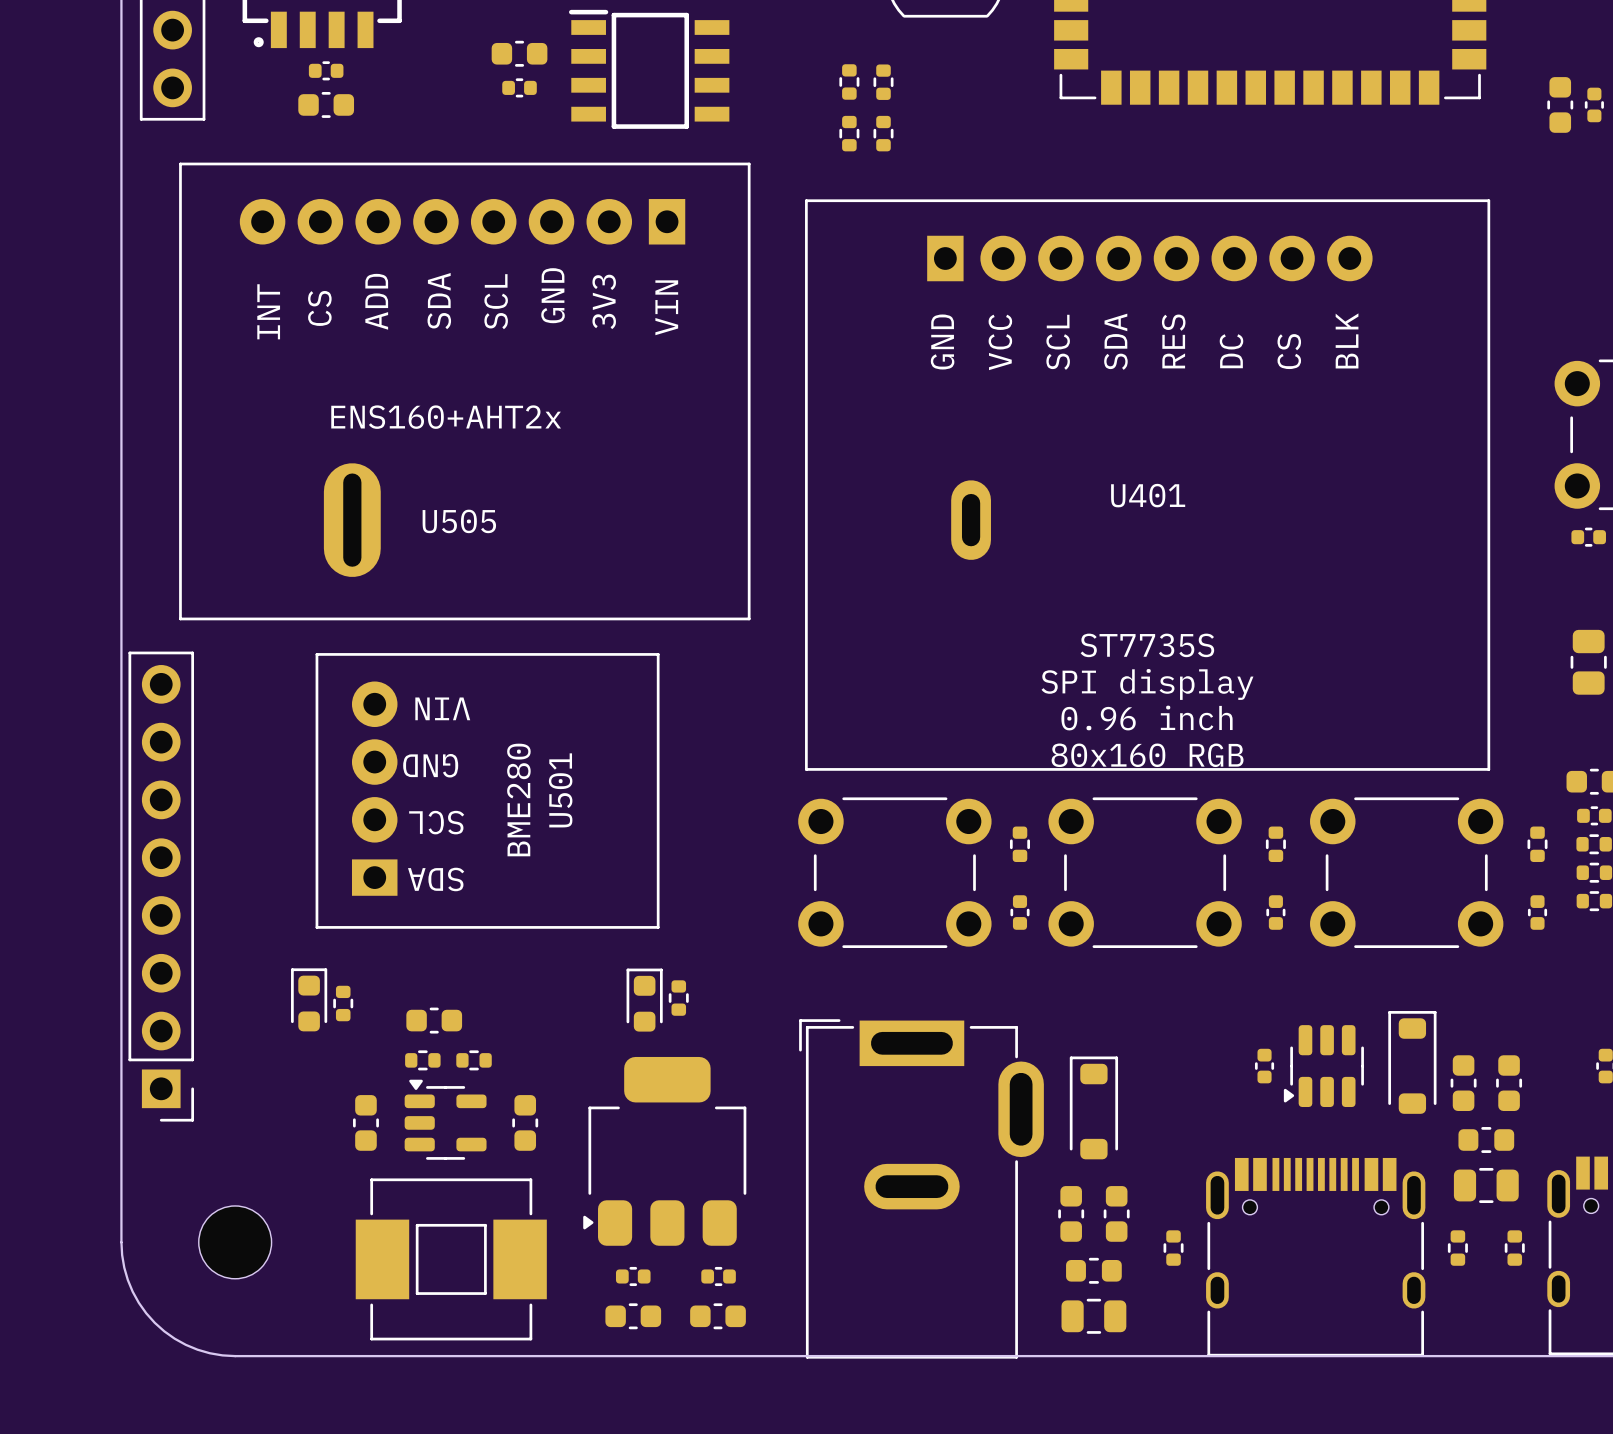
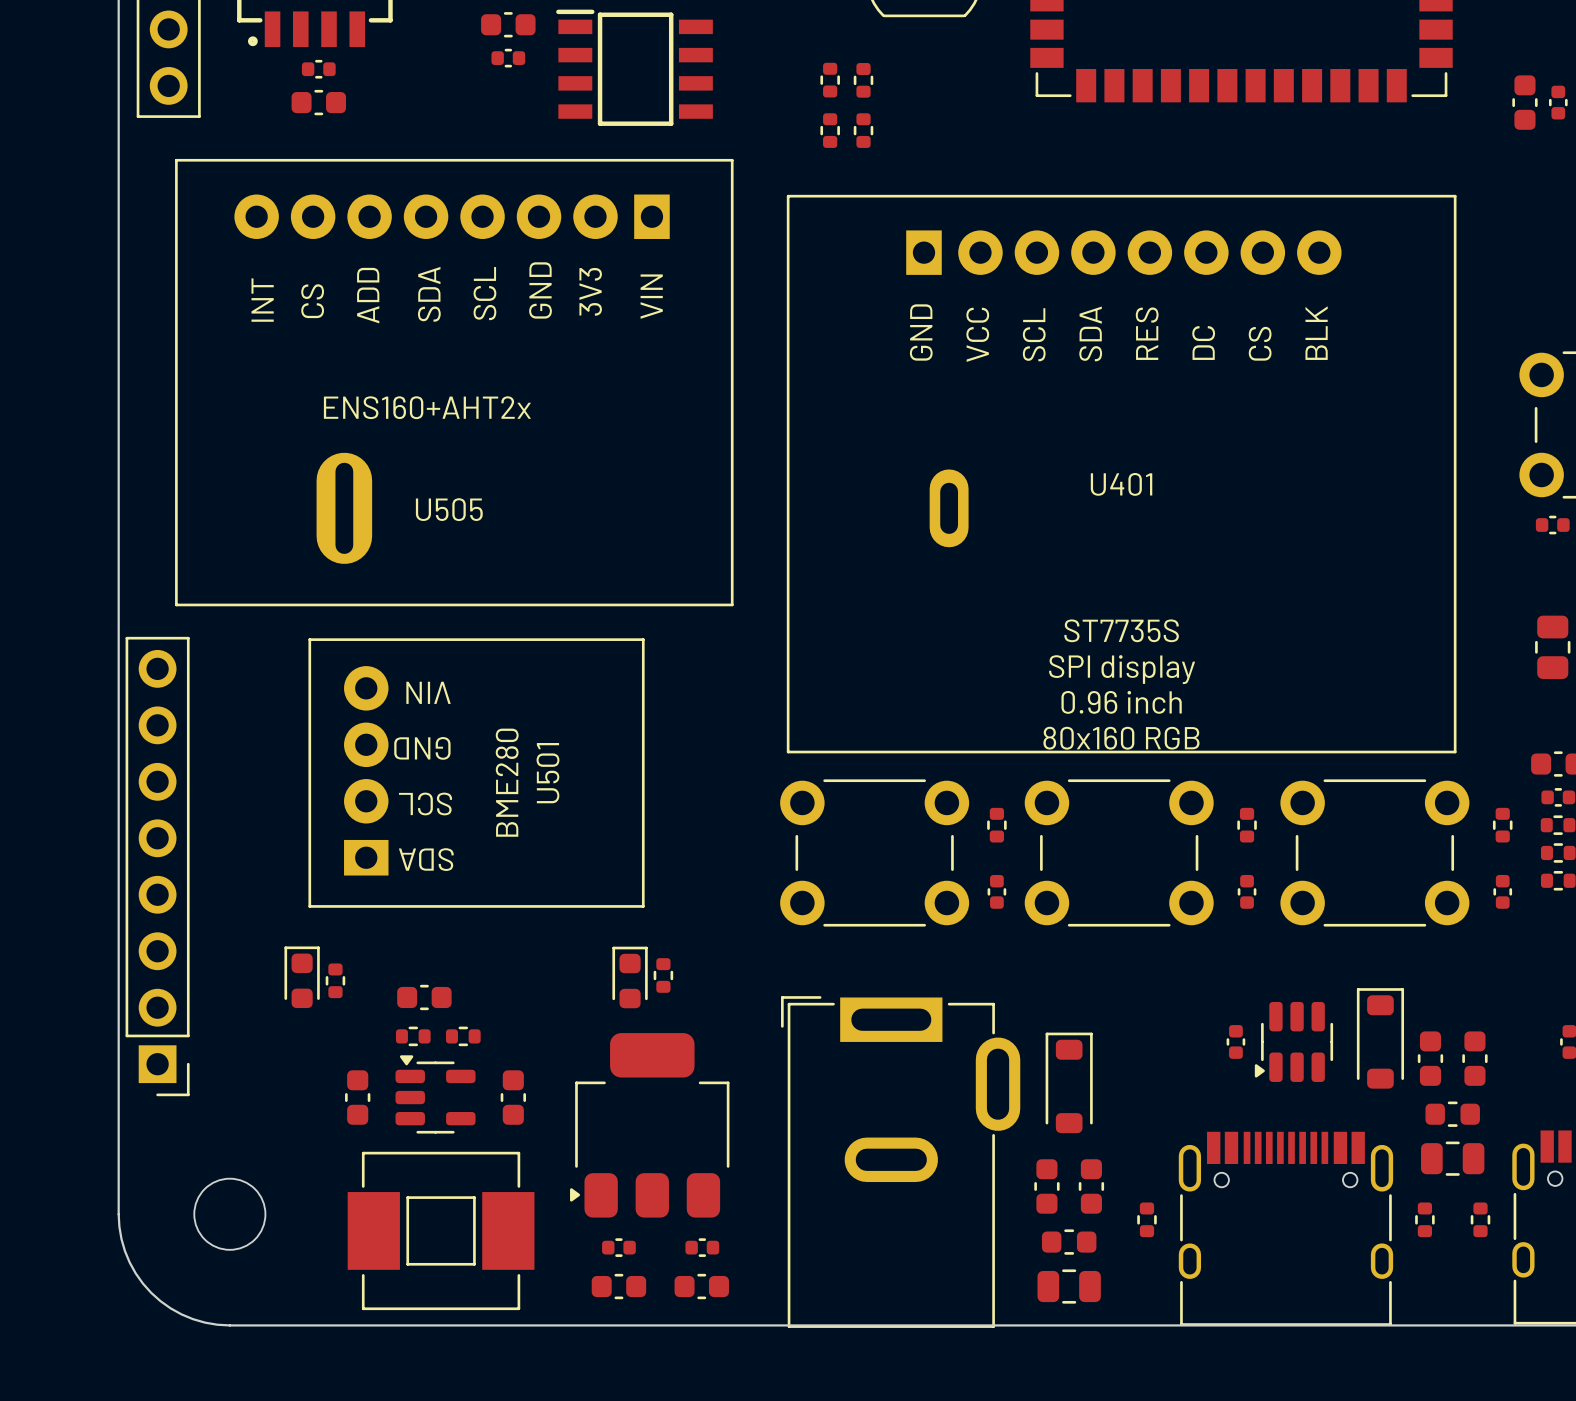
part: none -> (508, 24)
part footprint: [491, 40, 548, 67] -> [491, 48, 526, 68]
part: (519, 87) -> none

